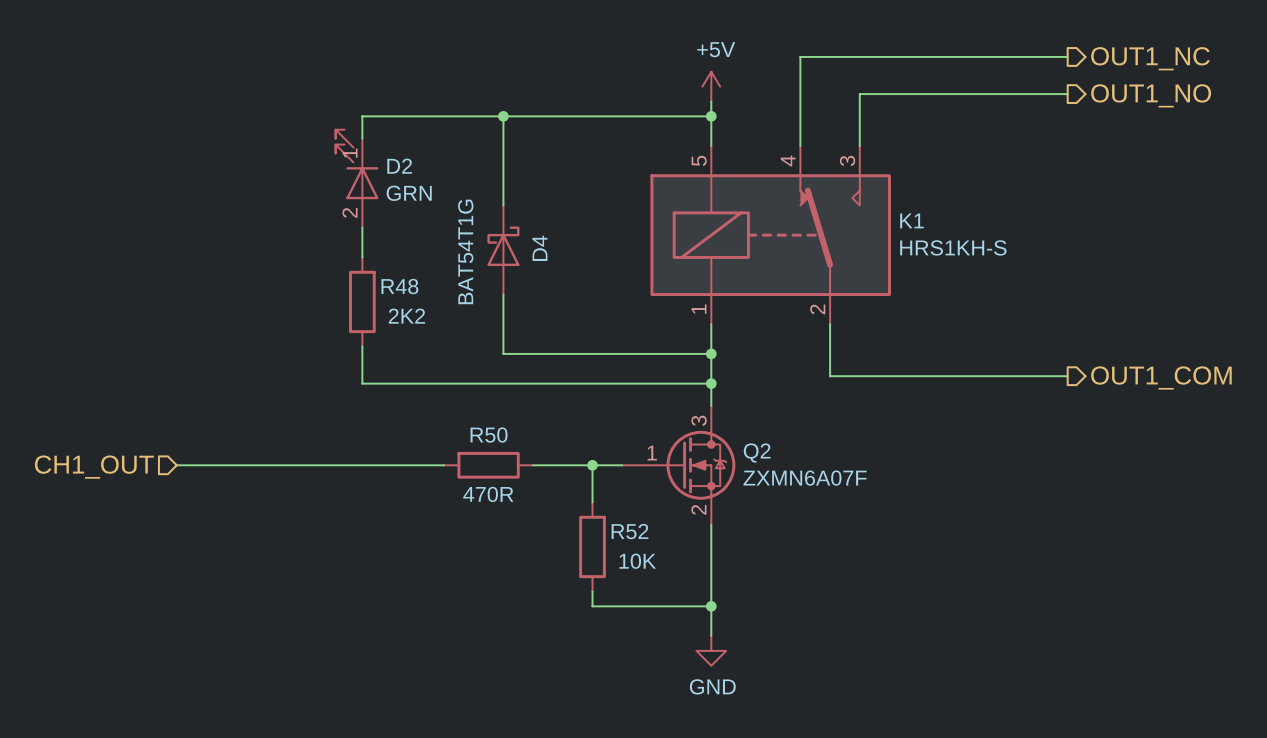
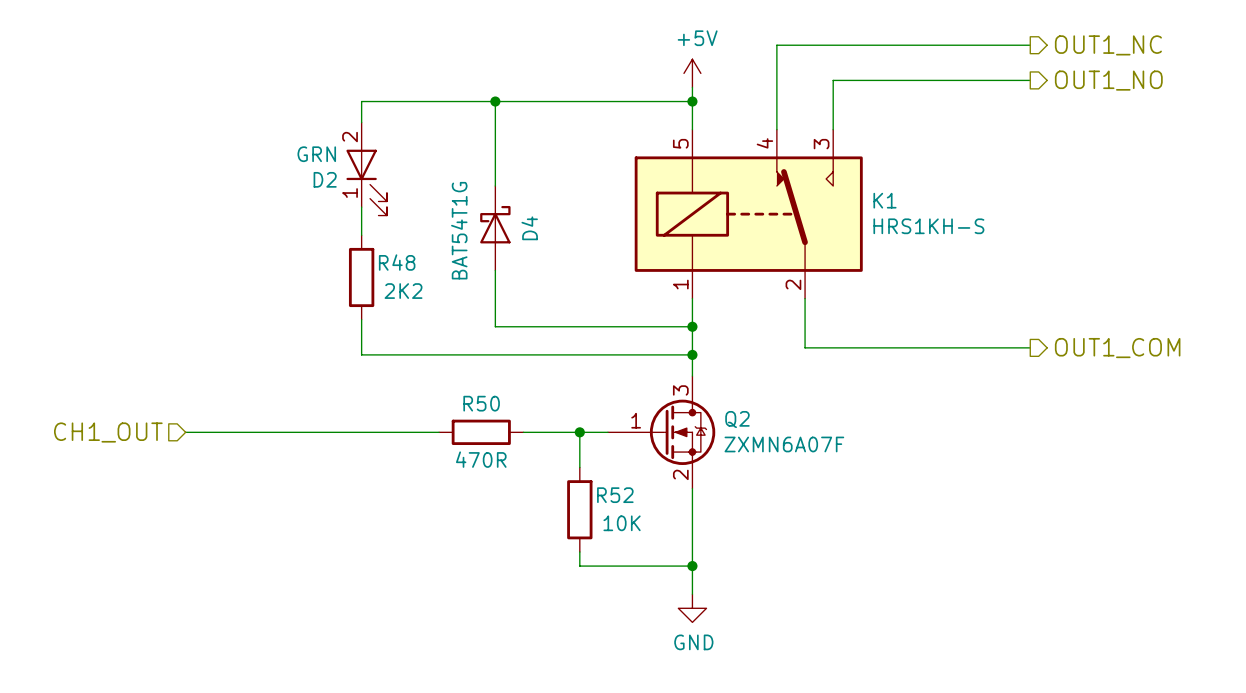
D2 rotation: 0° (357, 164) -> 180° (366, 182)

